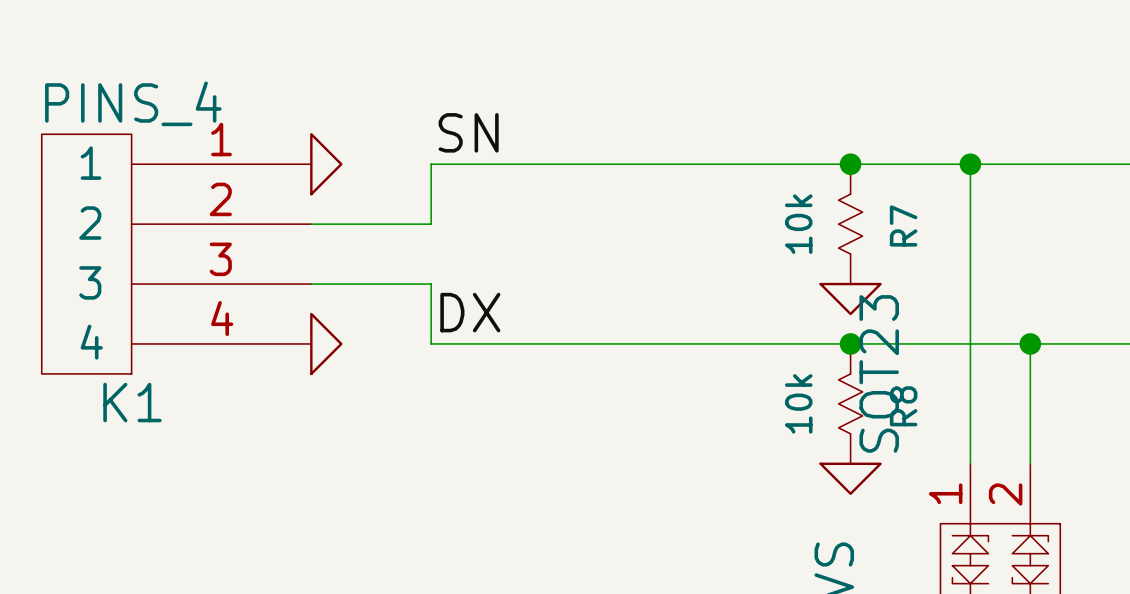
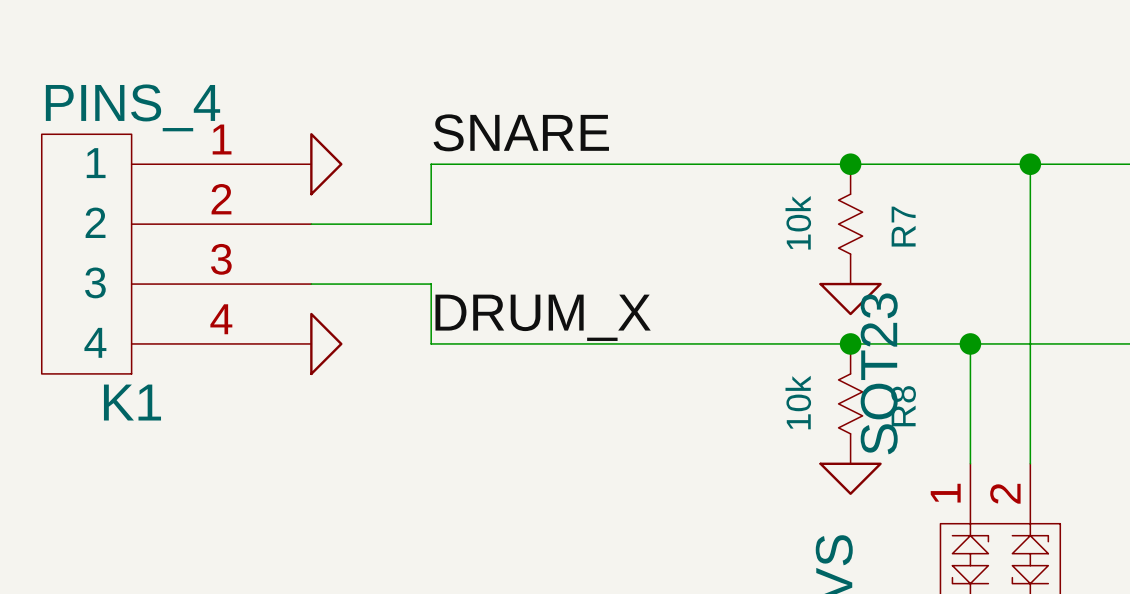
label: SN (468, 132) -> SNARE (521, 132)
wire: (970, 164) (970, 343) -> (1030, 164) (1030, 343)
junction position: (970, 164) -> (1030, 164)
label: DX (470, 312) -> DRUM_X (543, 317)
junction position: (1030, 343) -> (970, 343)

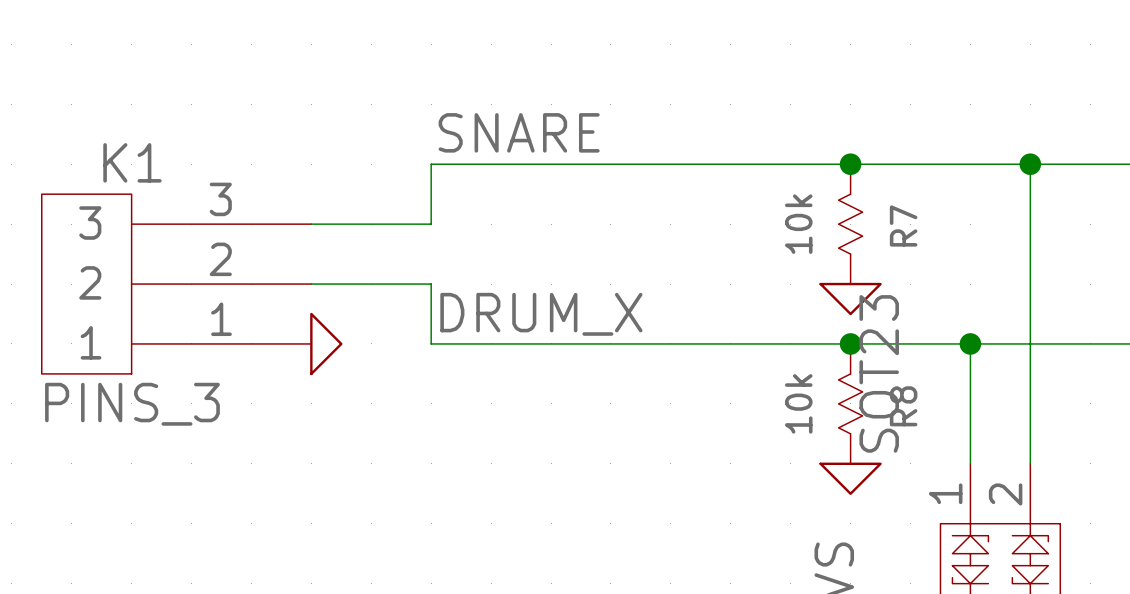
K1 value: PINS_4 (132, 107) -> PINS_3 (132, 404)
K1 symbol: [41, 134, 312, 374] -> [41, 194, 312, 374]
power symbol: (326, 164) -> none
K1 name position: K1 (132, 402) -> K1 (132, 162)

